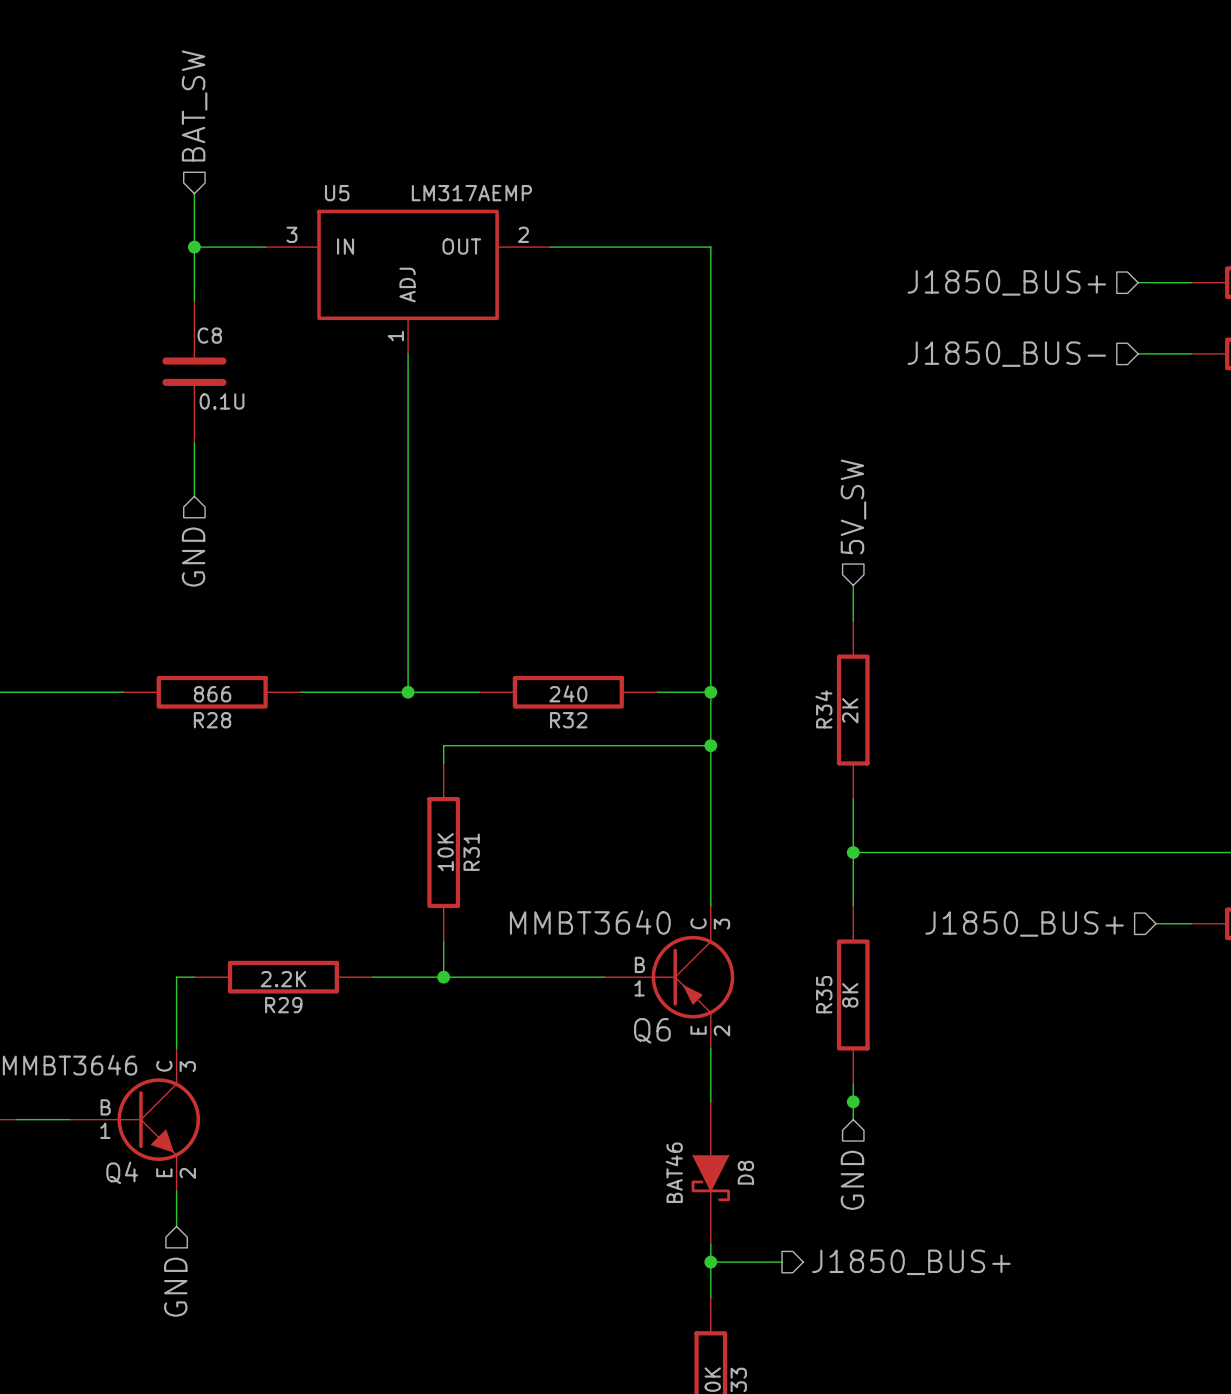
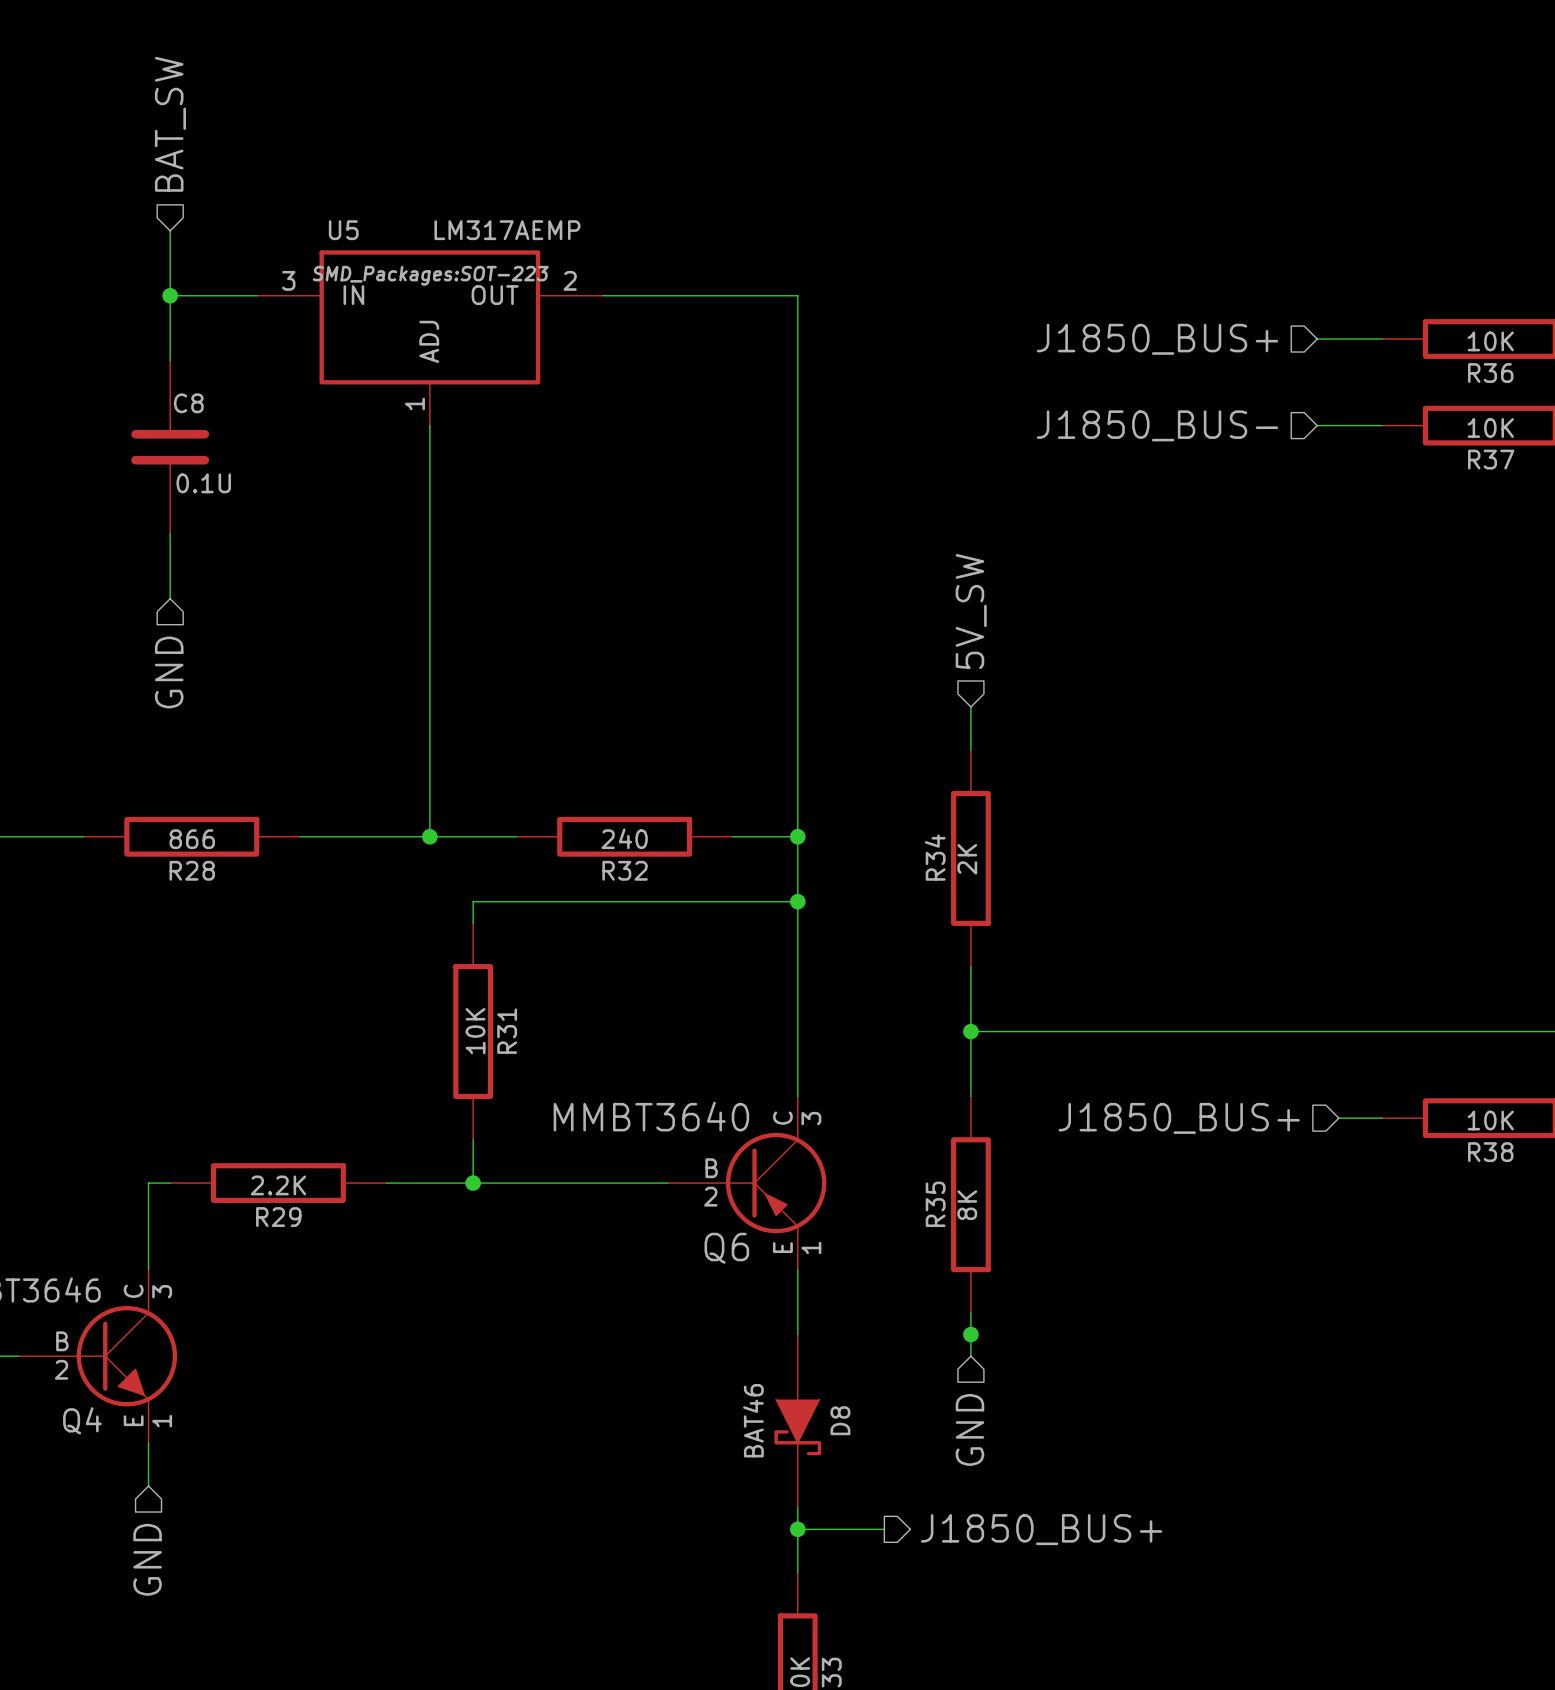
U5 text: none -> SMD_Packages:SOT-223 (430, 275)
Q6 pin number: 1 (639, 988) -> 2 (710, 1196)
Q6 pin number: 2 (721, 1030) -> 1 (811, 1247)
Q4 pin number: 1 (105, 1130) -> 2 (61, 1369)
Q4 pin number: 2 (187, 1173) -> 1 (162, 1421)

